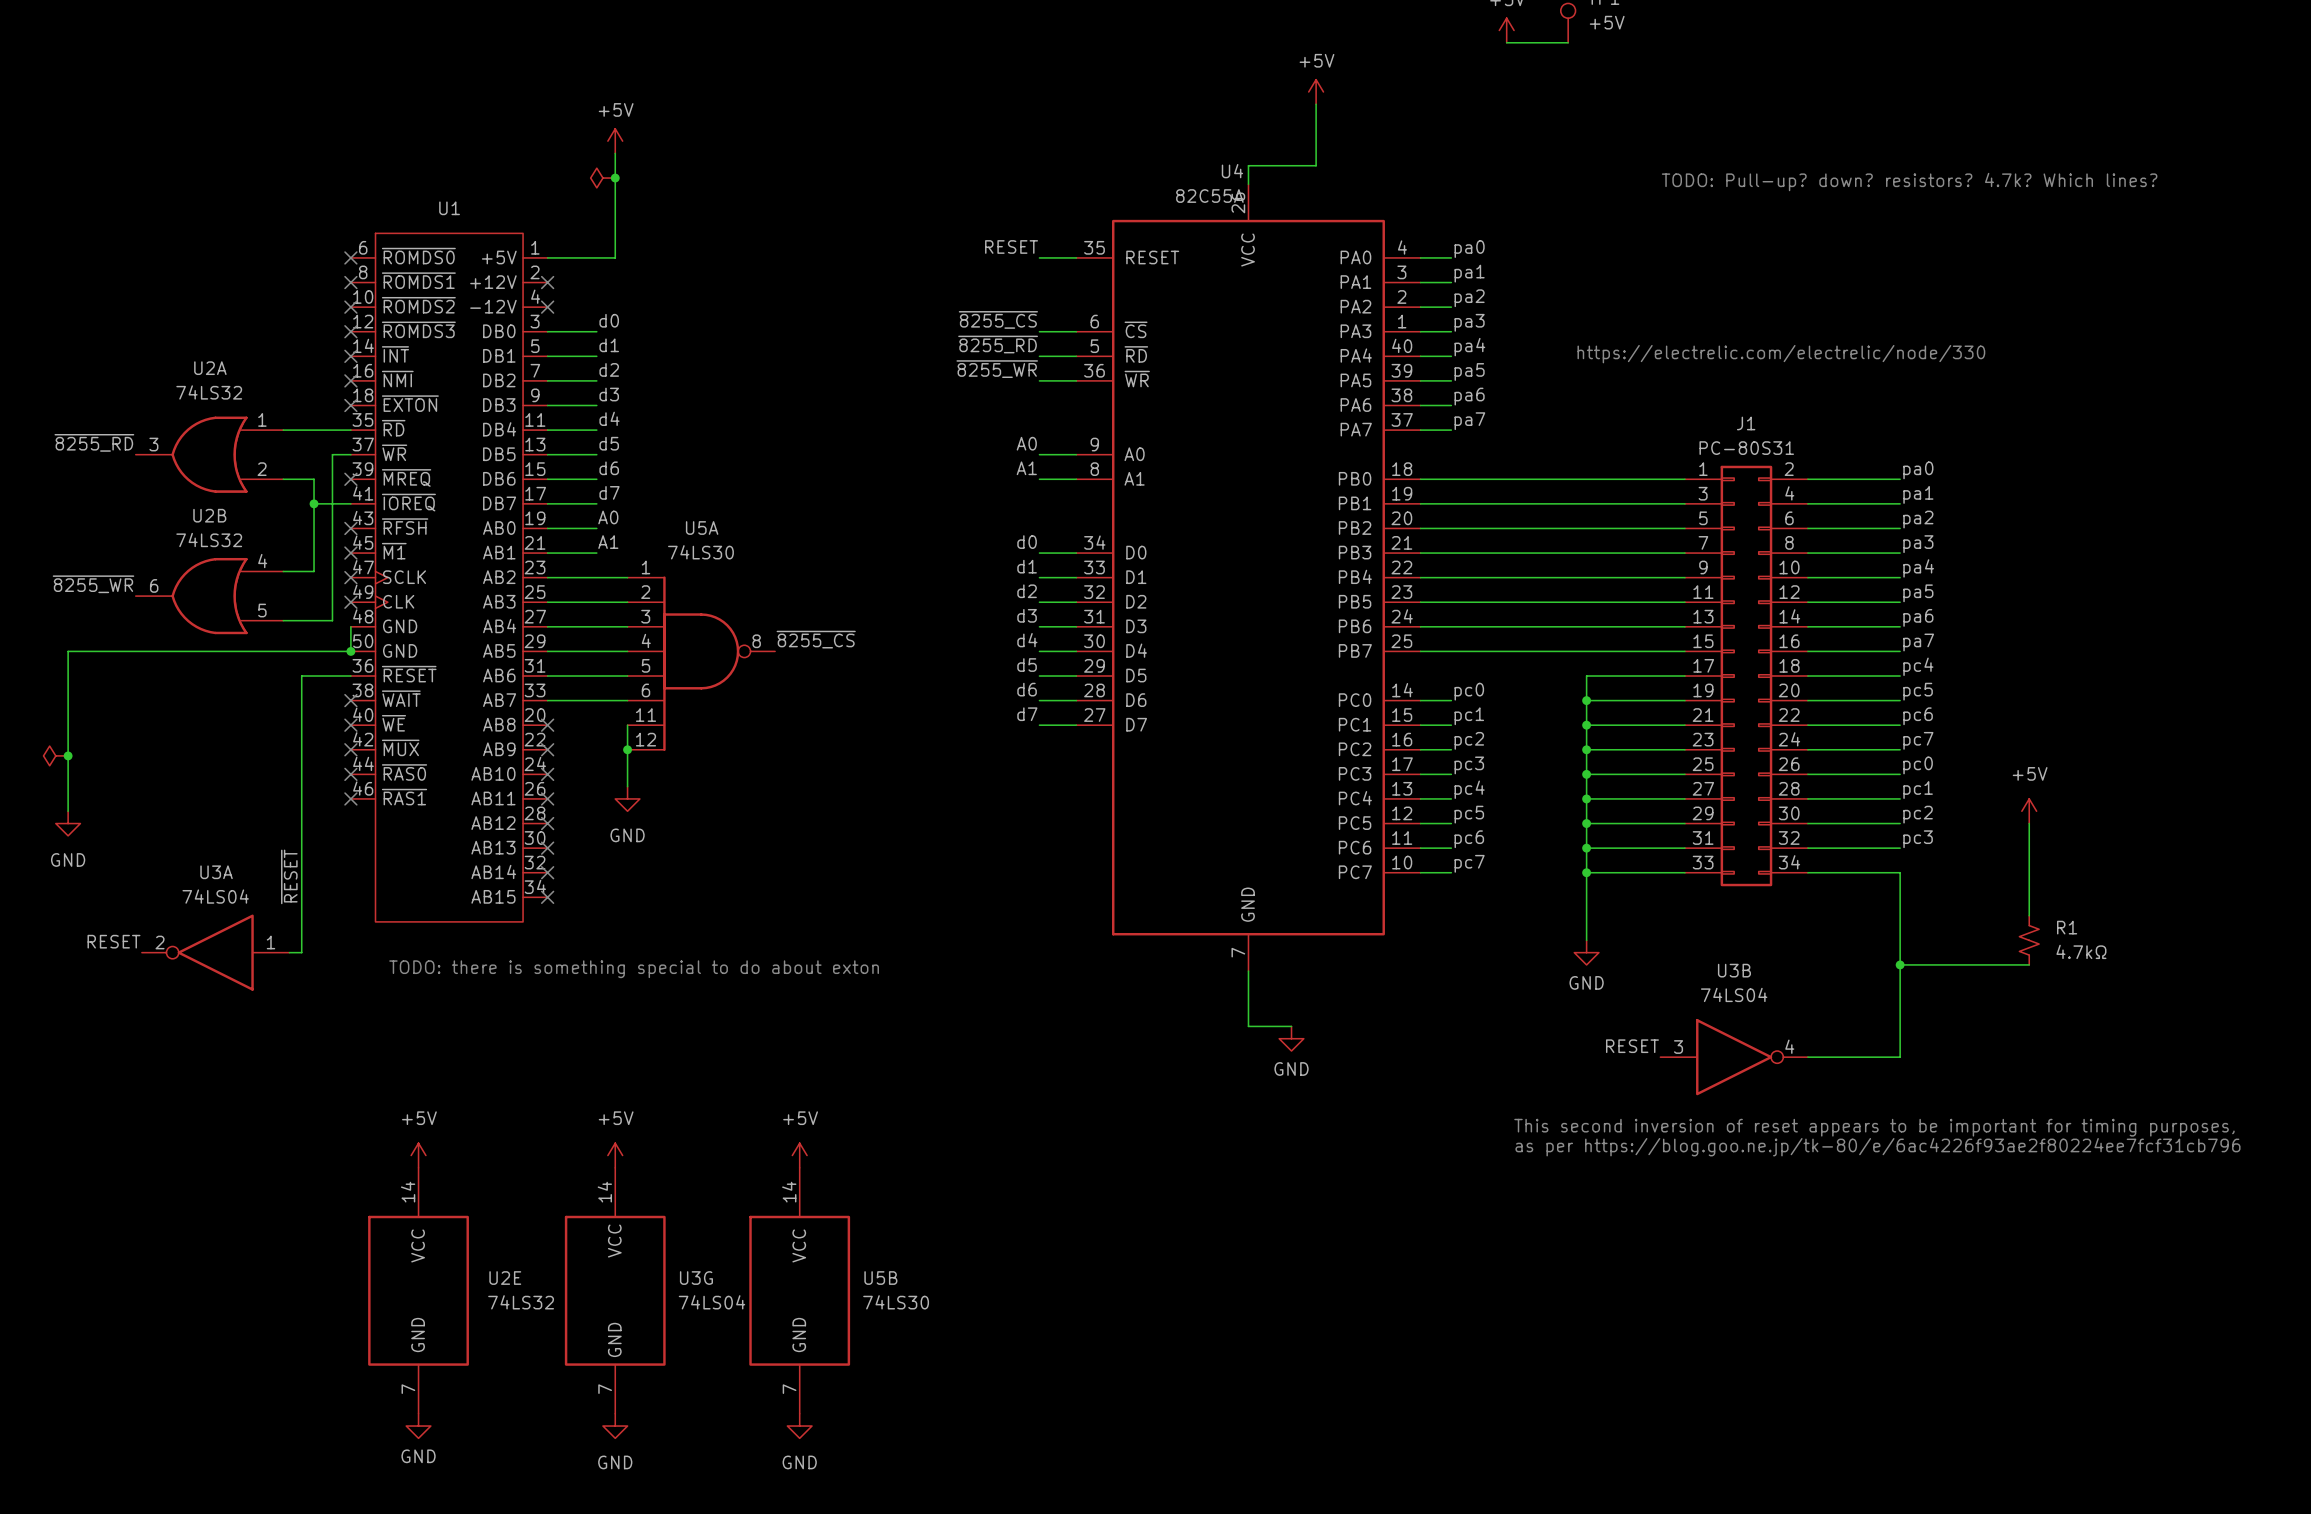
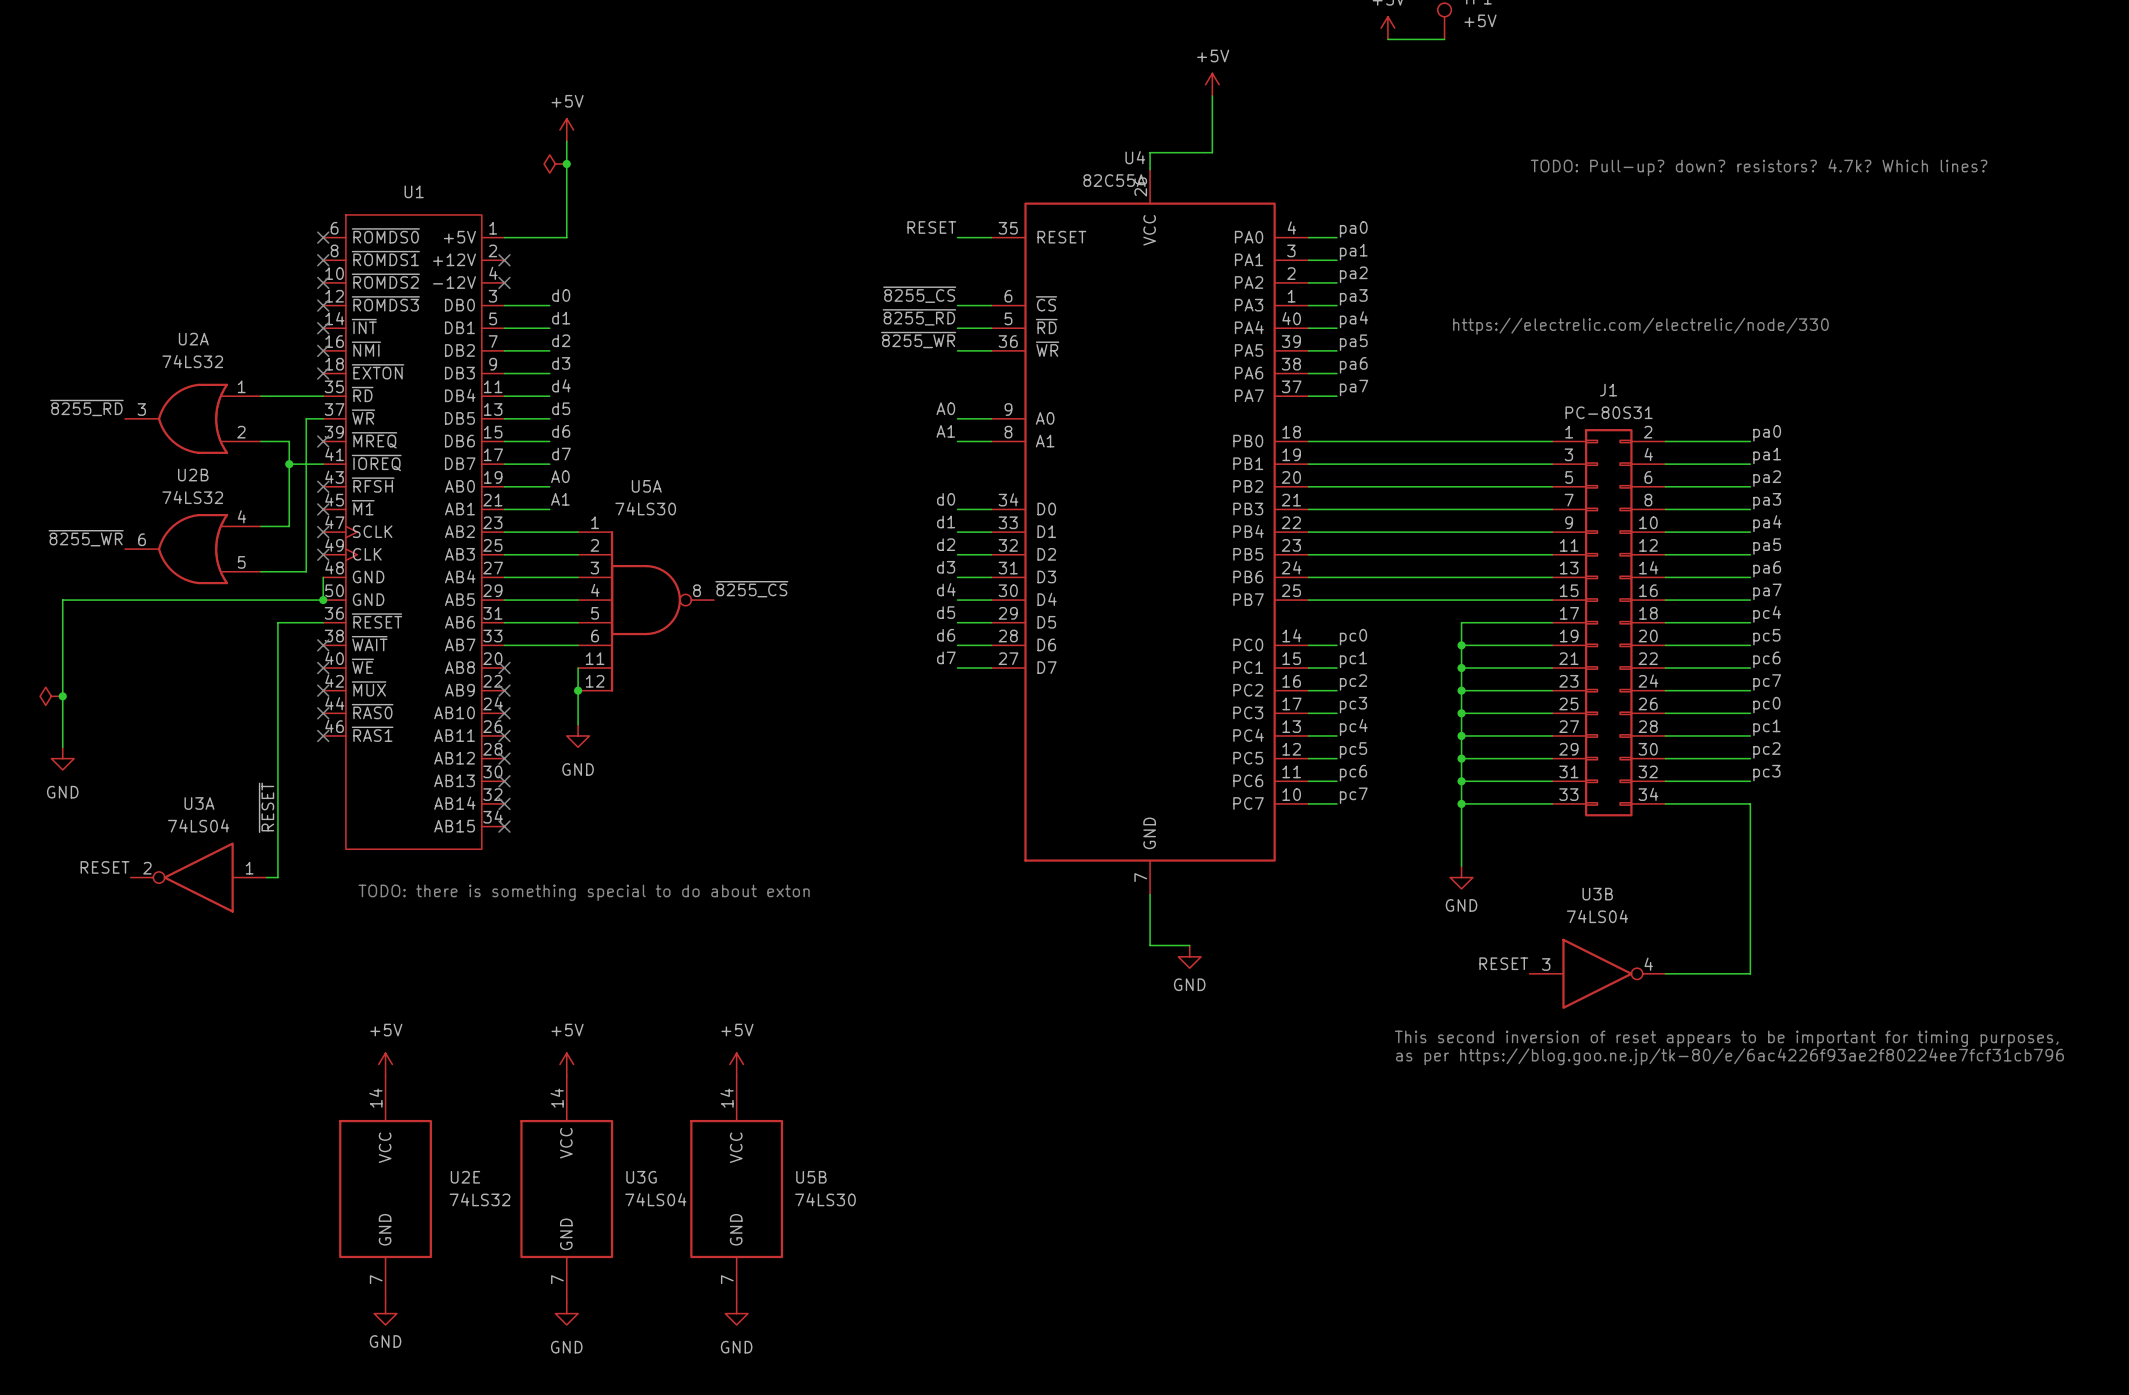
power symbol: +5V (2029, 811) -> none
wire: (2029, 823) (2029, 915) -> none
R1: 4.7kΩ (2029, 940) -> none
wire: (1900, 964) (2029, 964) -> none
junction: (1900, 964) -> none

